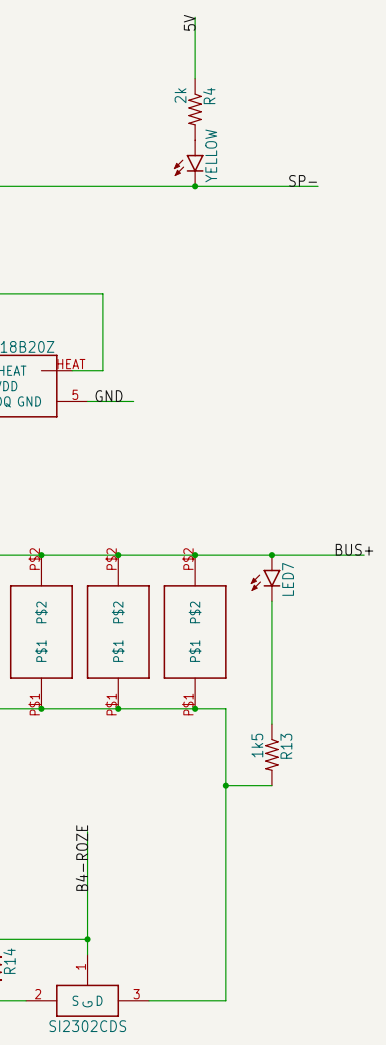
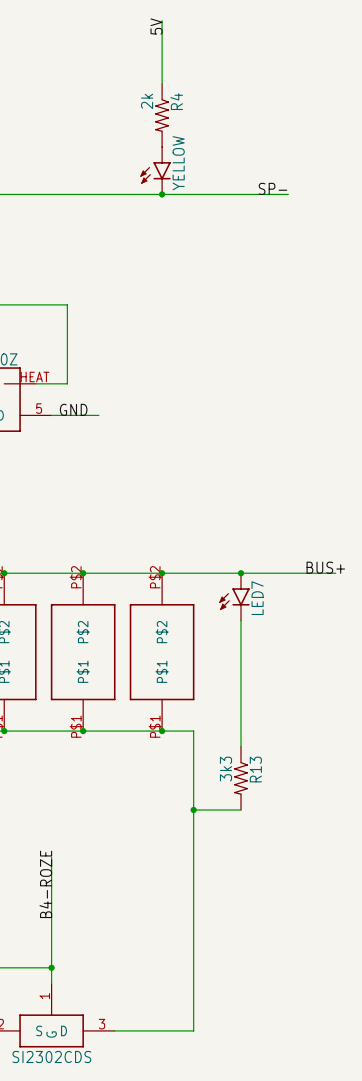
R13 value: 1k5 (257, 745) -> 3k3 (226, 769)

